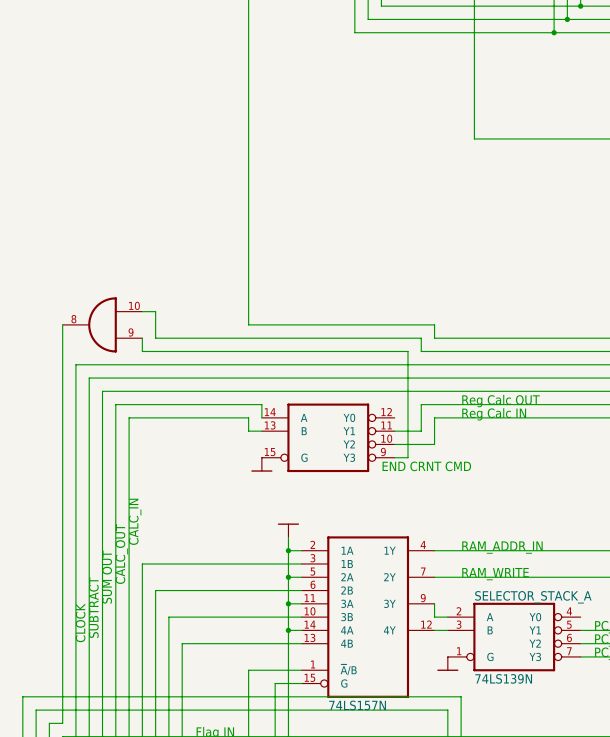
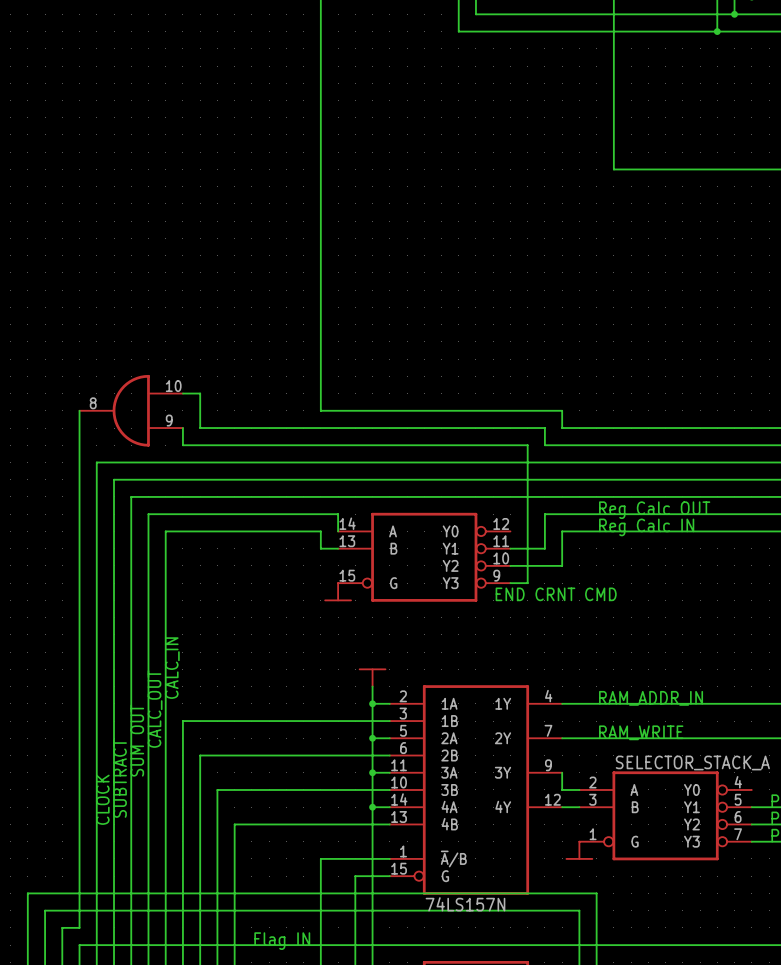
SELECTOR_STACK_A value: 74LS139N (503, 678) -> none

